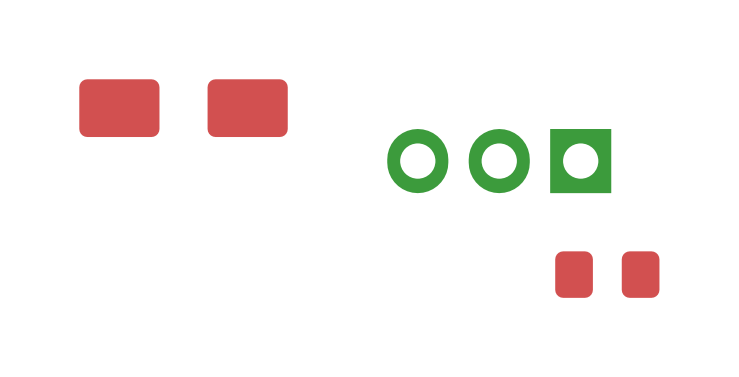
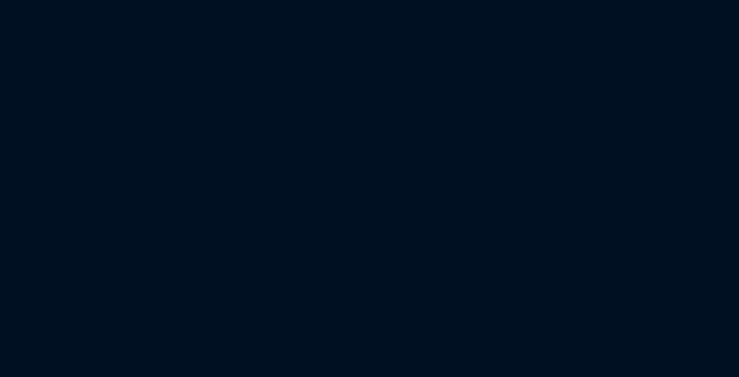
part: (183, 108) -> none
part: (499, 161) -> none
part: (607, 274) -> none

